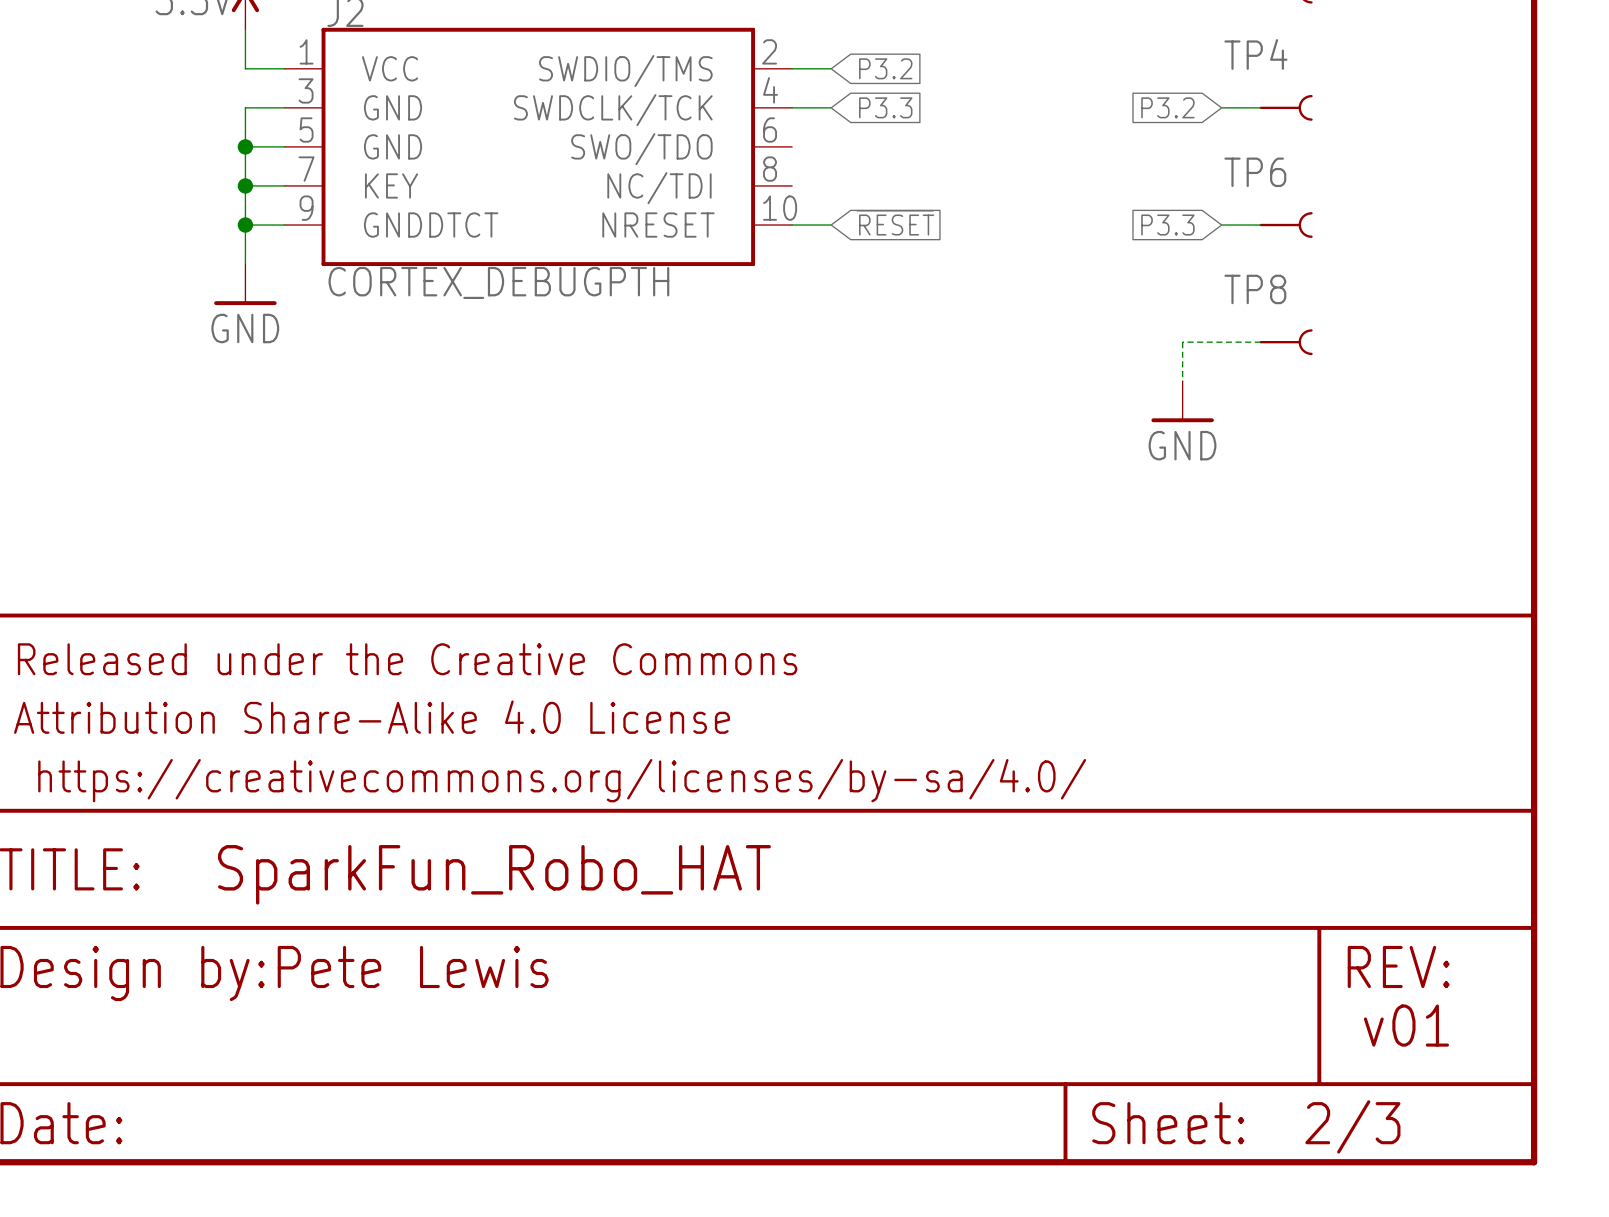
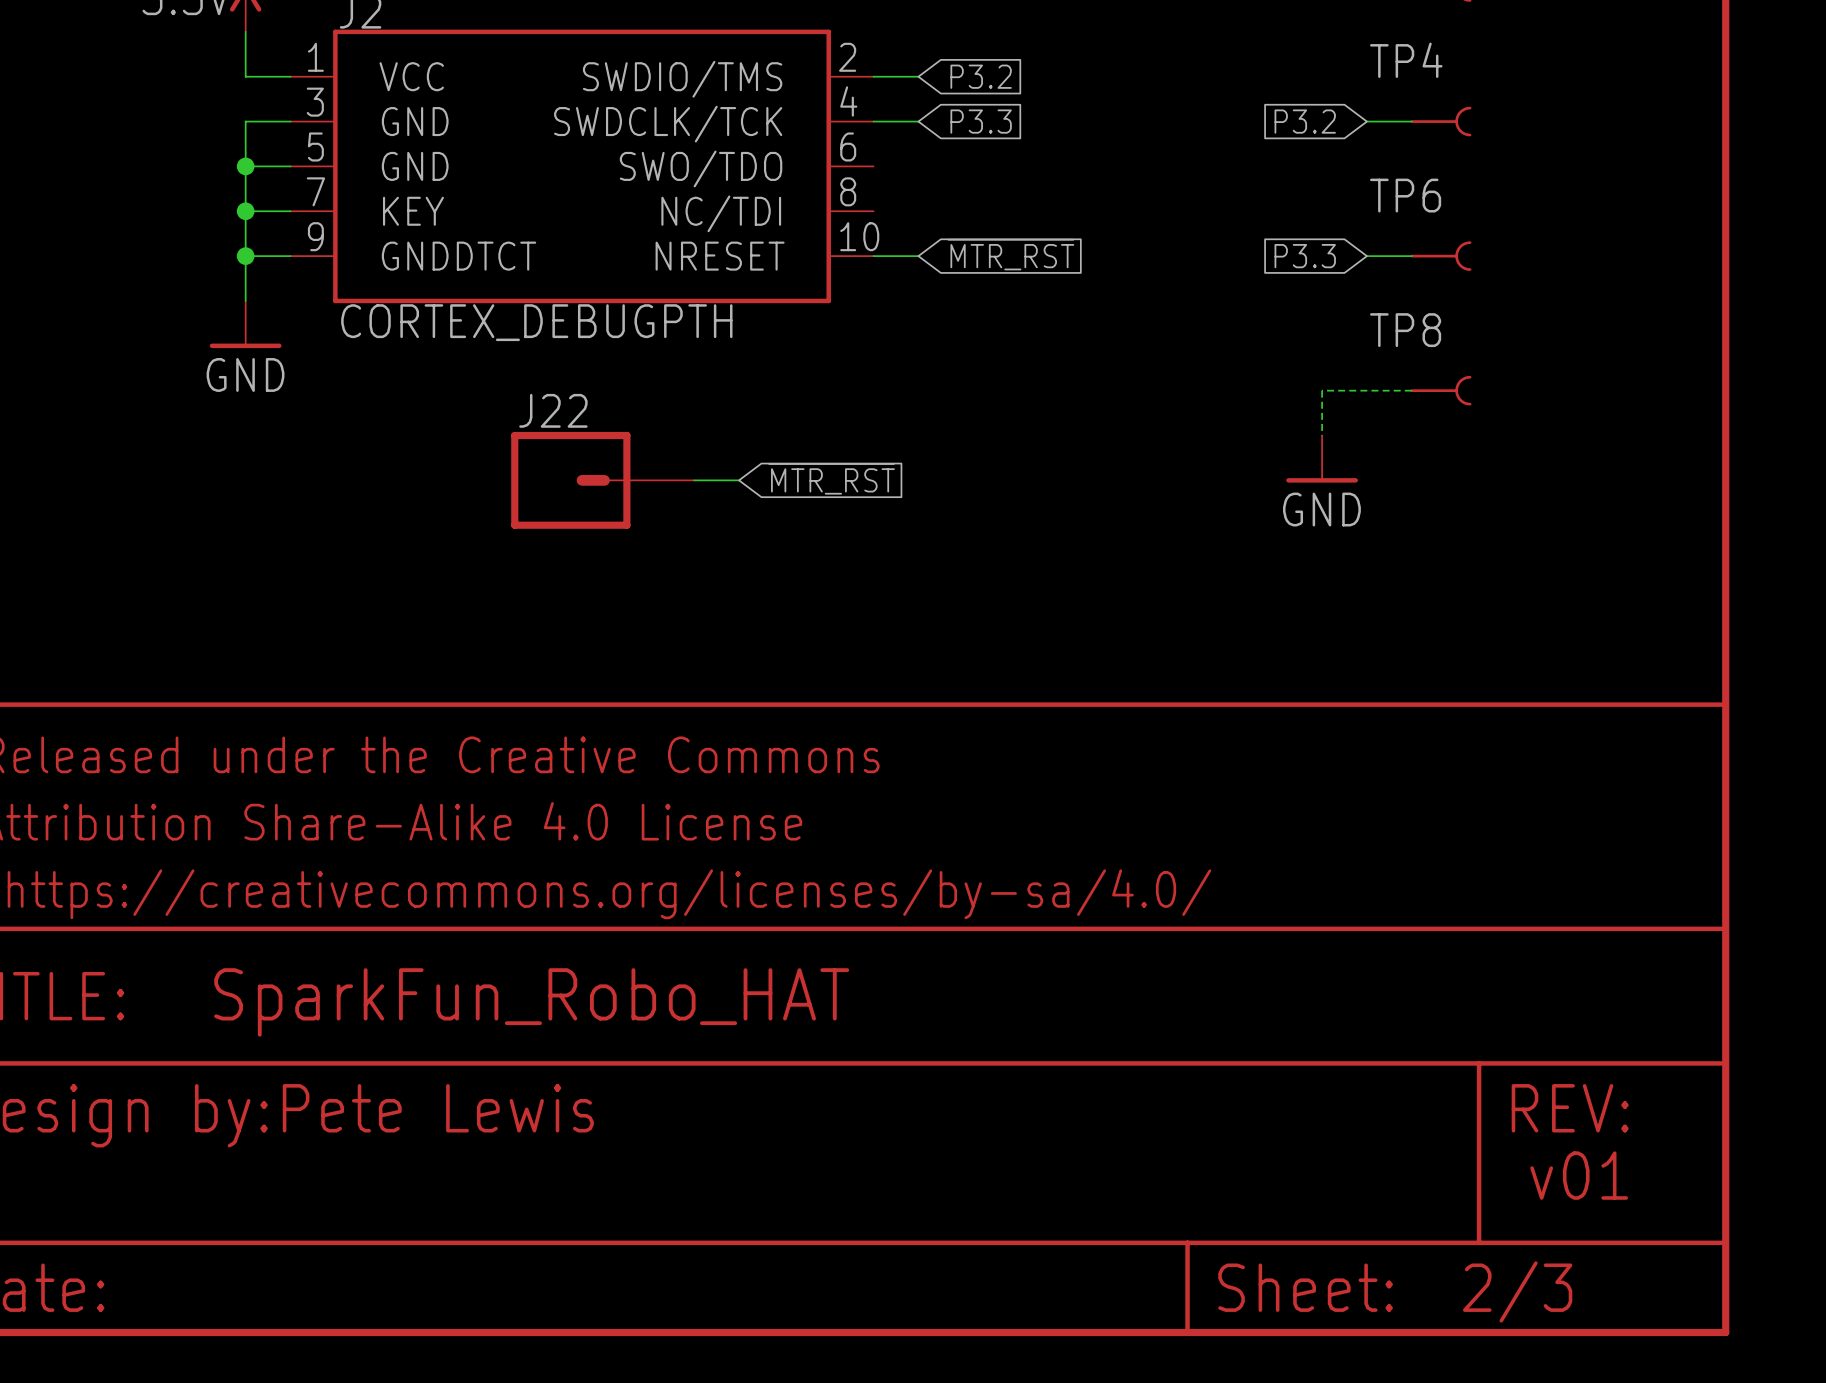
global label: ~{RESET} (895, 222) -> ~{MTR_RST} (1010, 254)
global label: none -> ~{MTR_RST} (831, 478)
J22: none -> (602, 480)
wire: none -> (694, 480) (739, 480)

